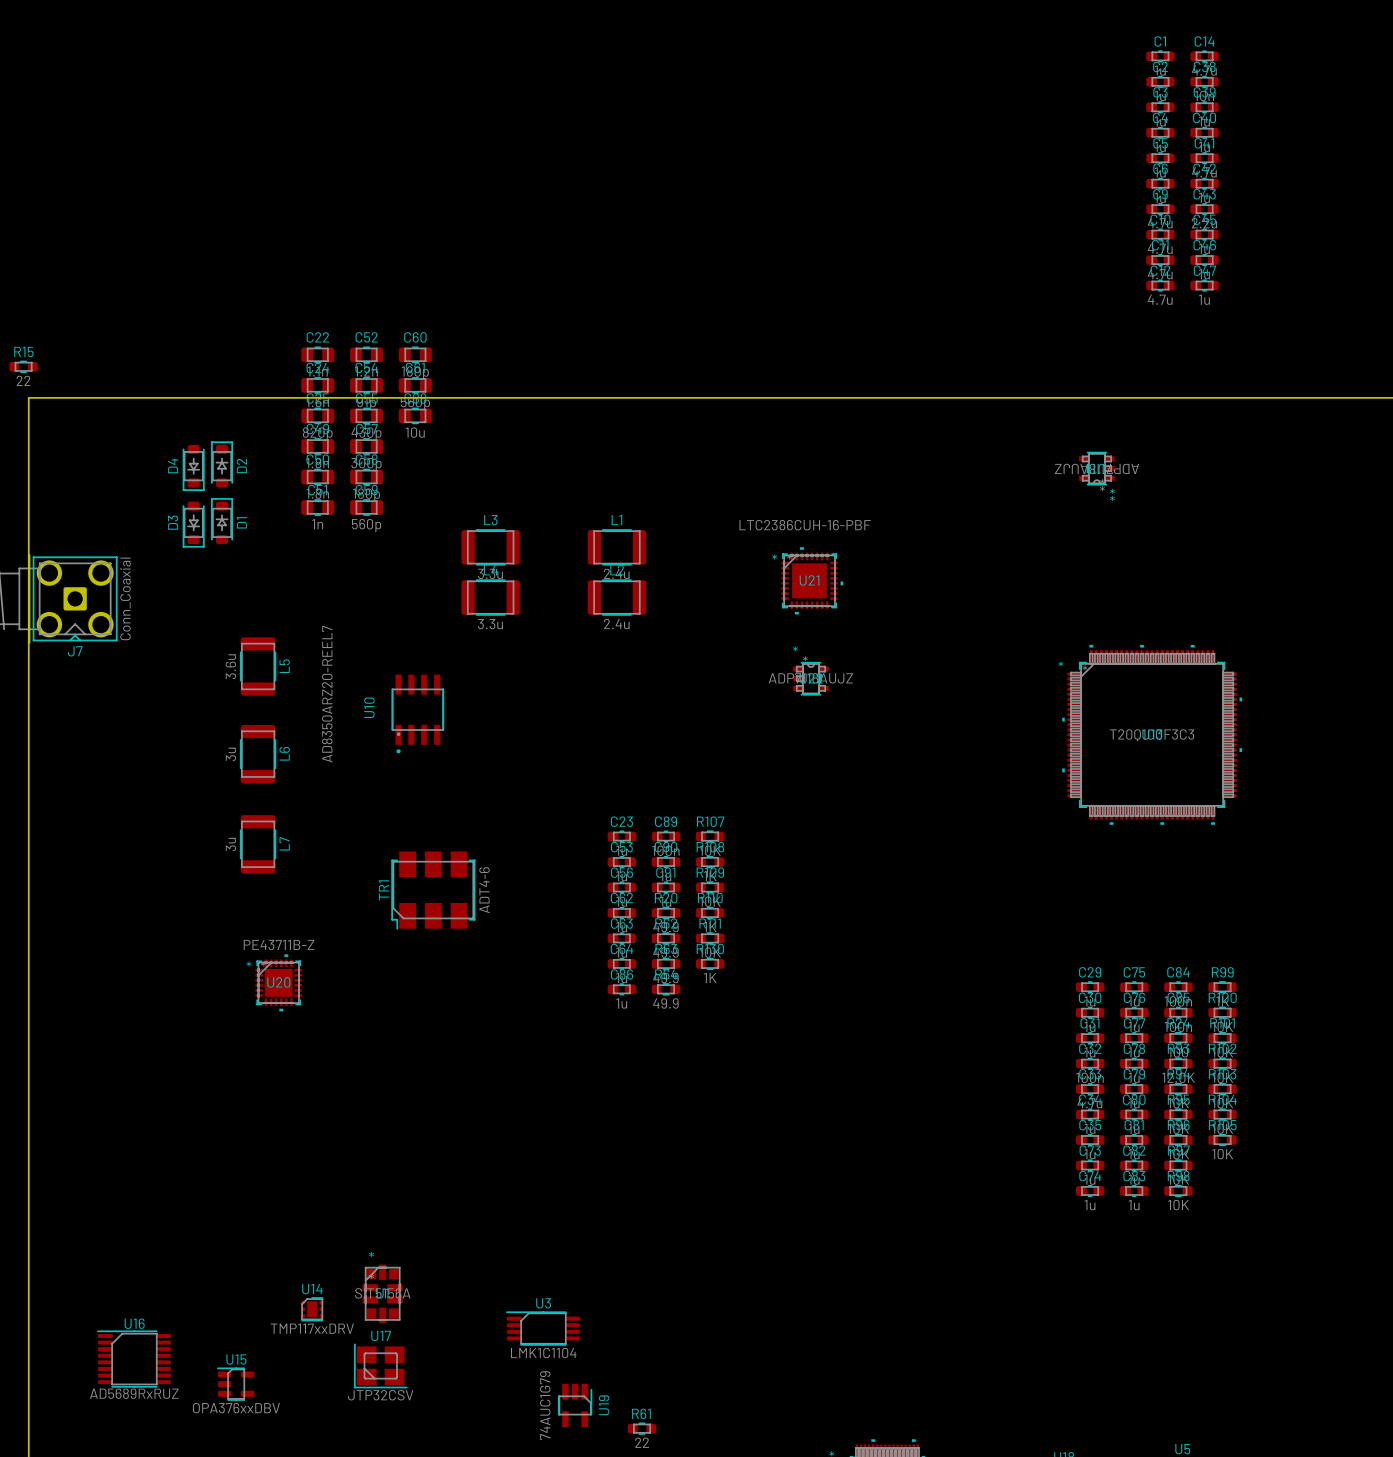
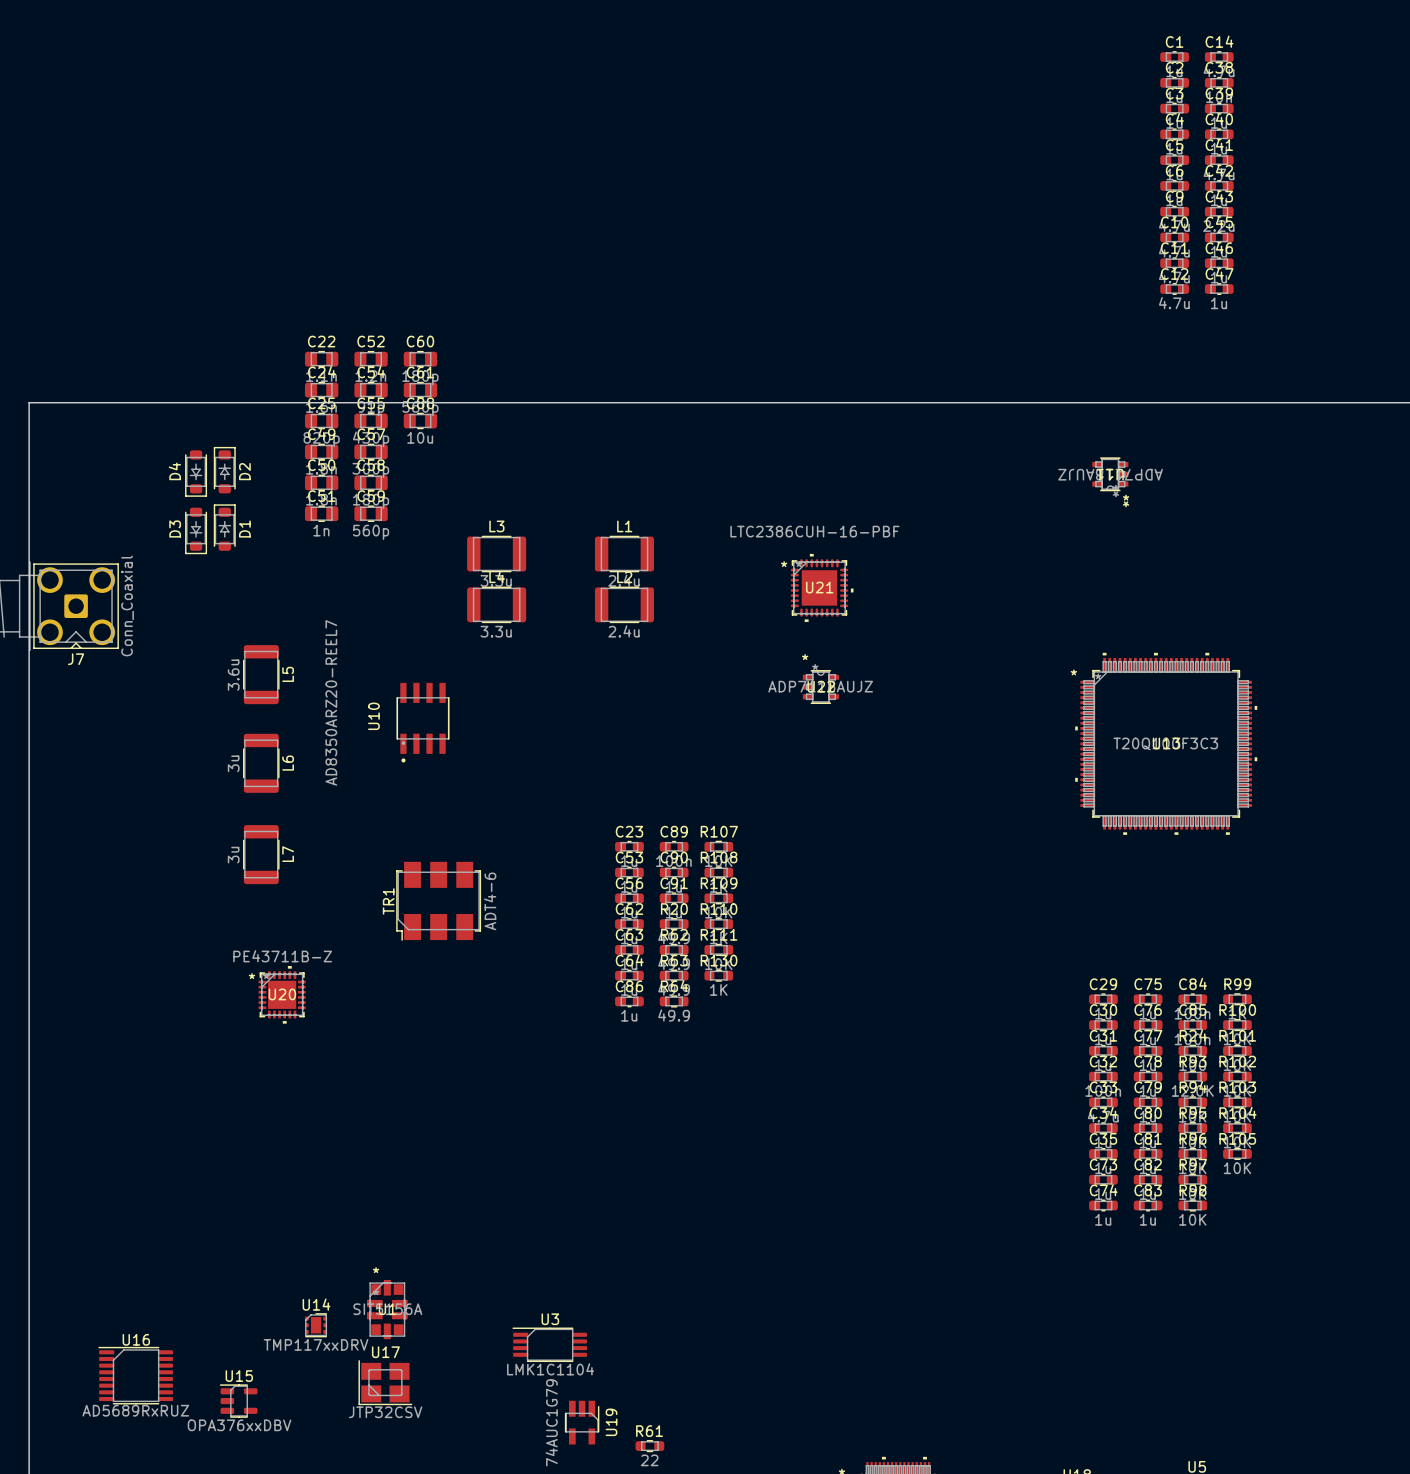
R15: 22 (23, 366) -> none

